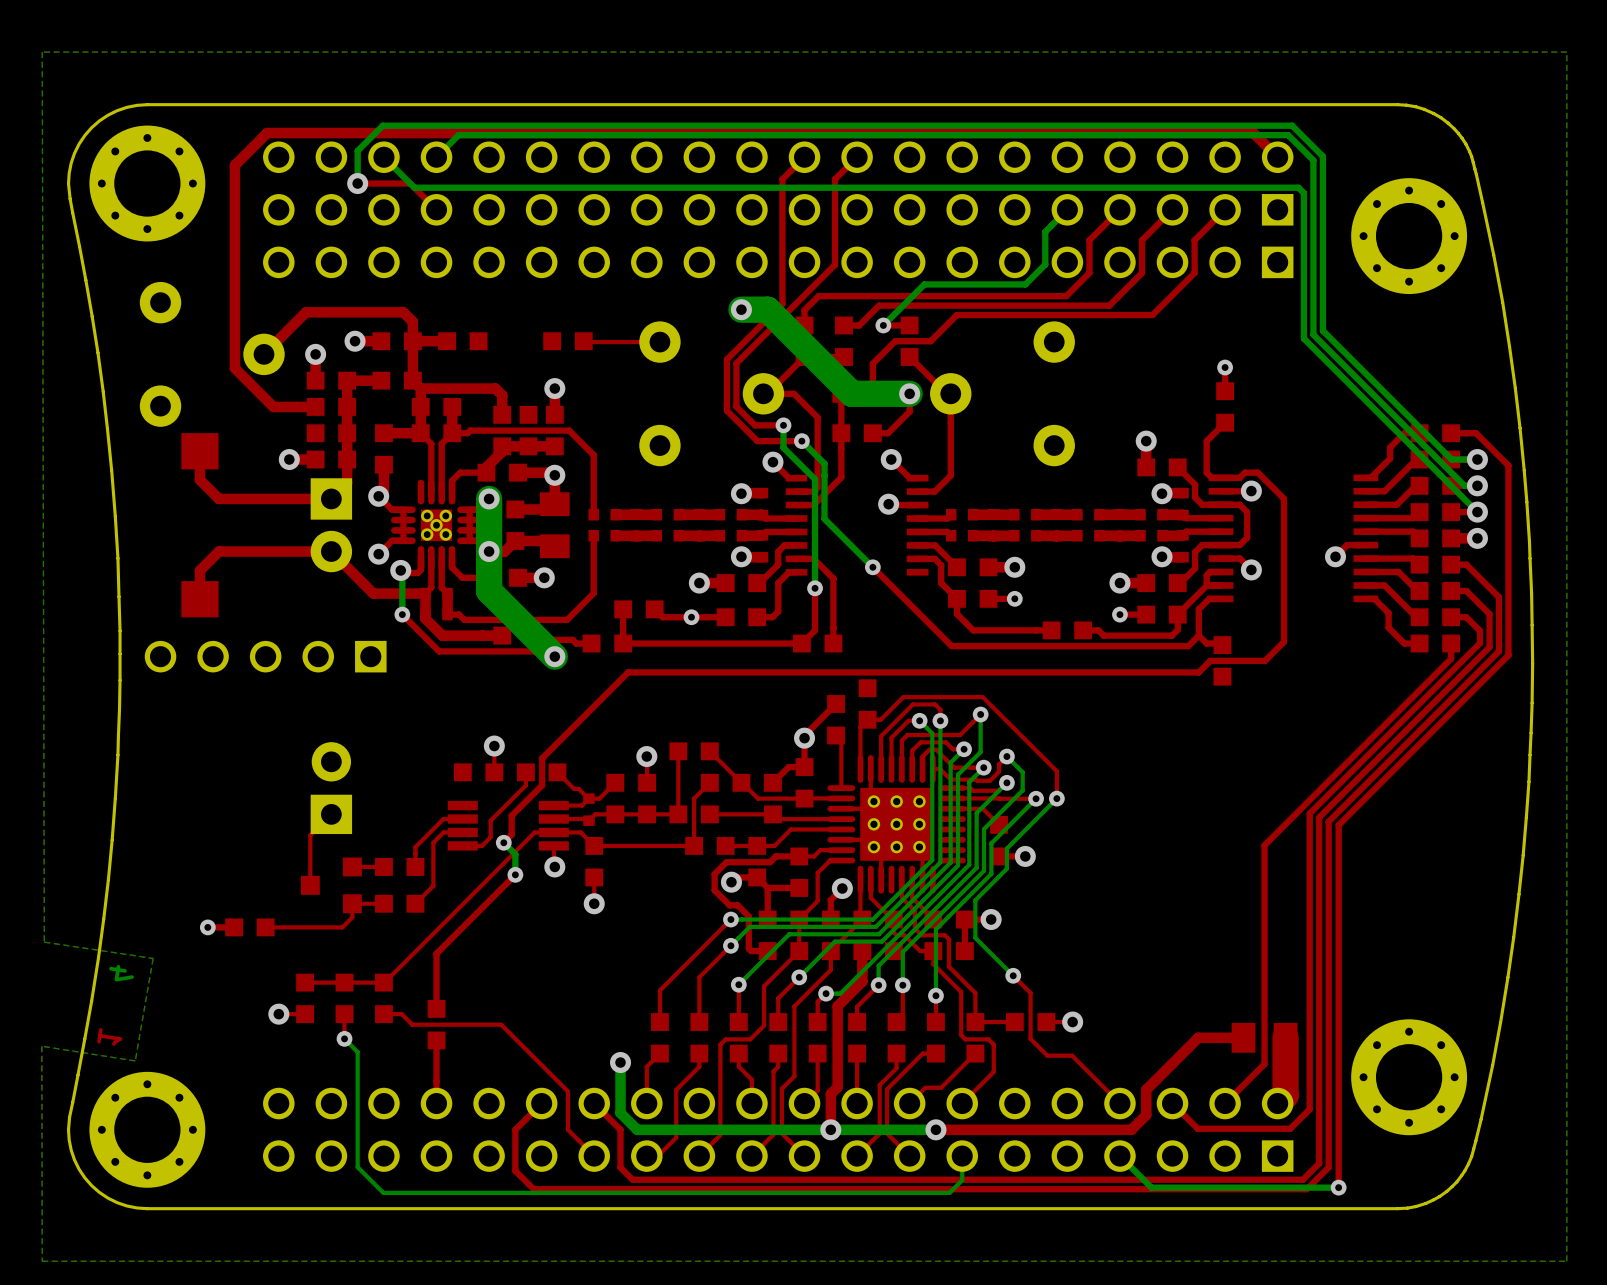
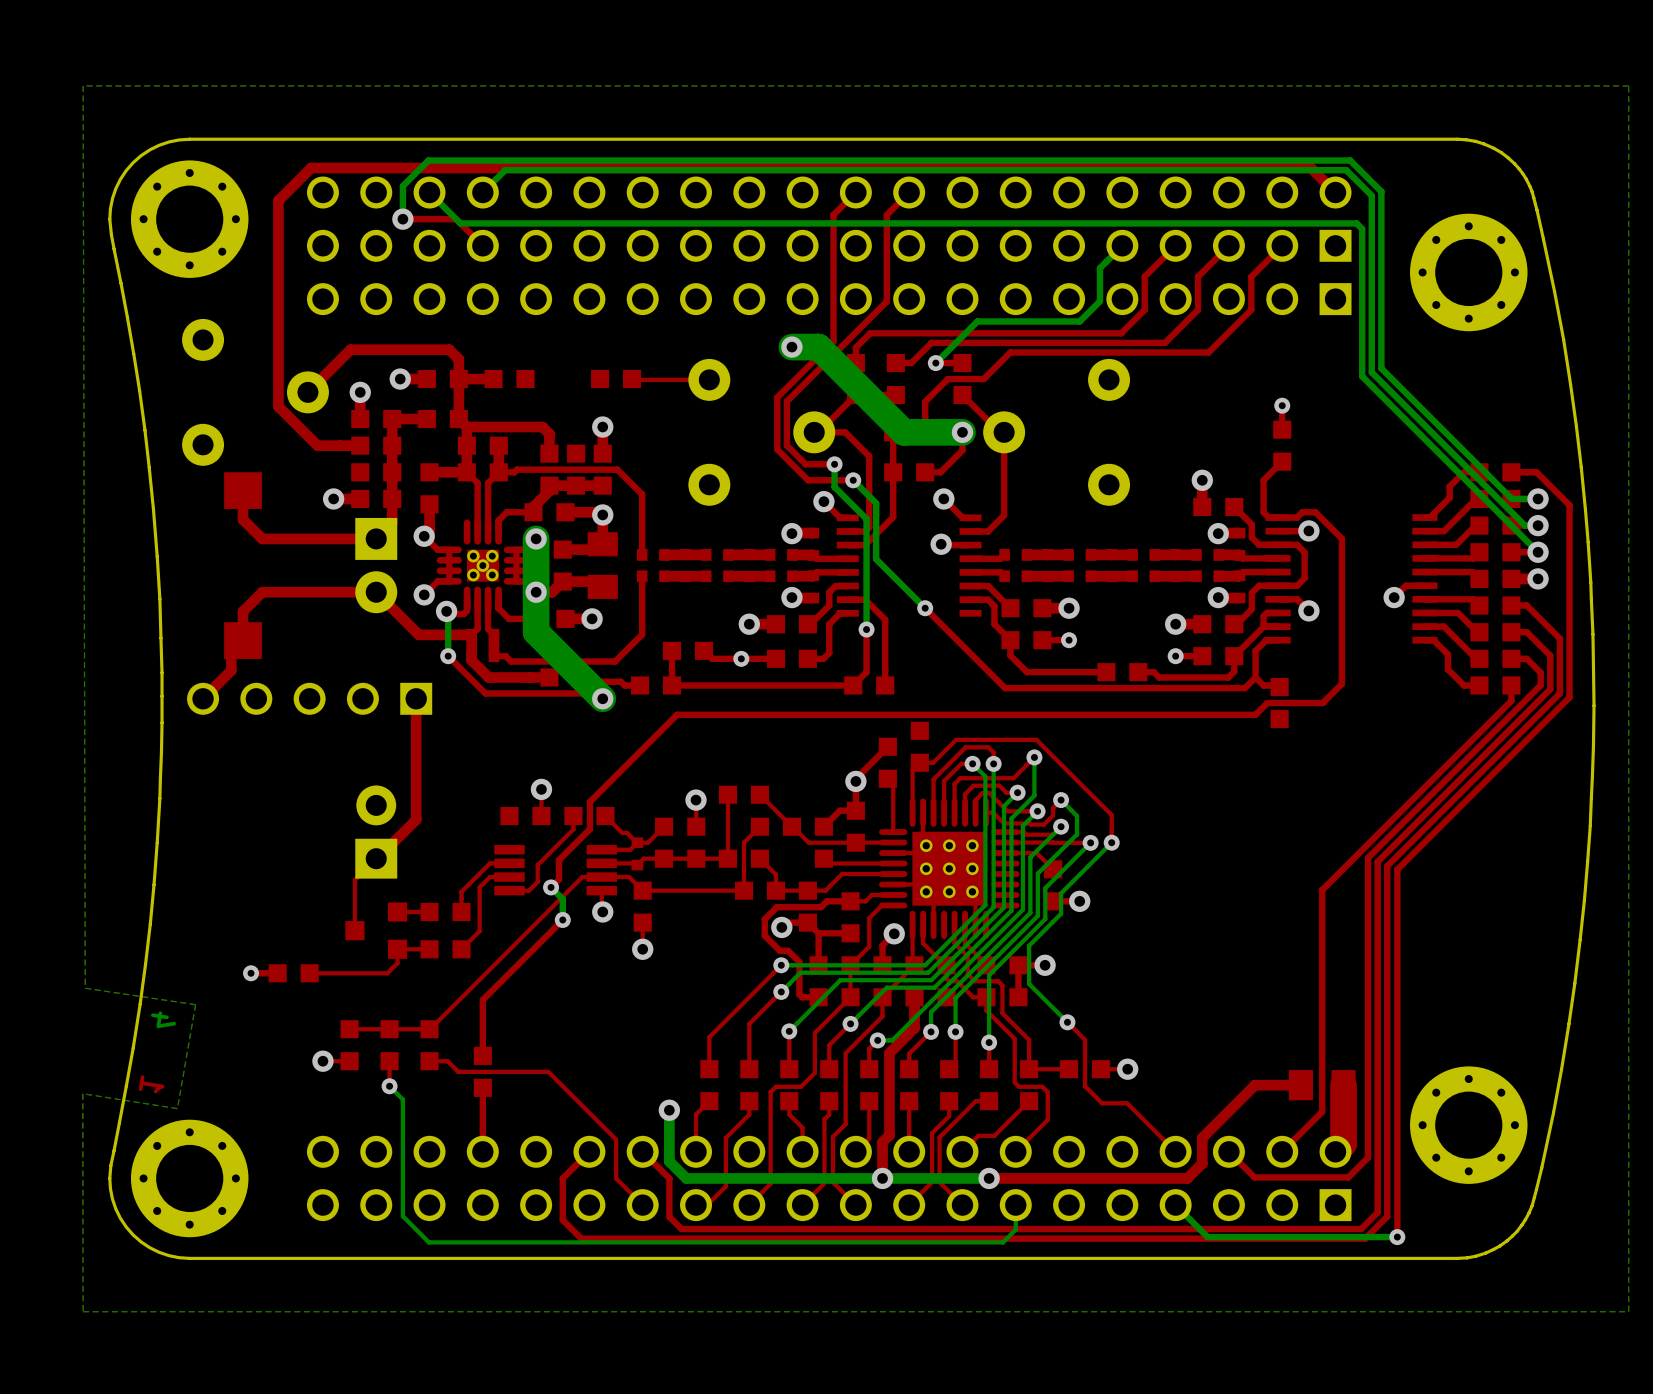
top track: none -> (243, 640) (231, 652) (231, 670) (203, 698)
top track: none -> (416, 698) (416, 819) (376, 858)
top track: (772, 814) (709, 814) -> (775, 890) (775, 874) (759, 858)

